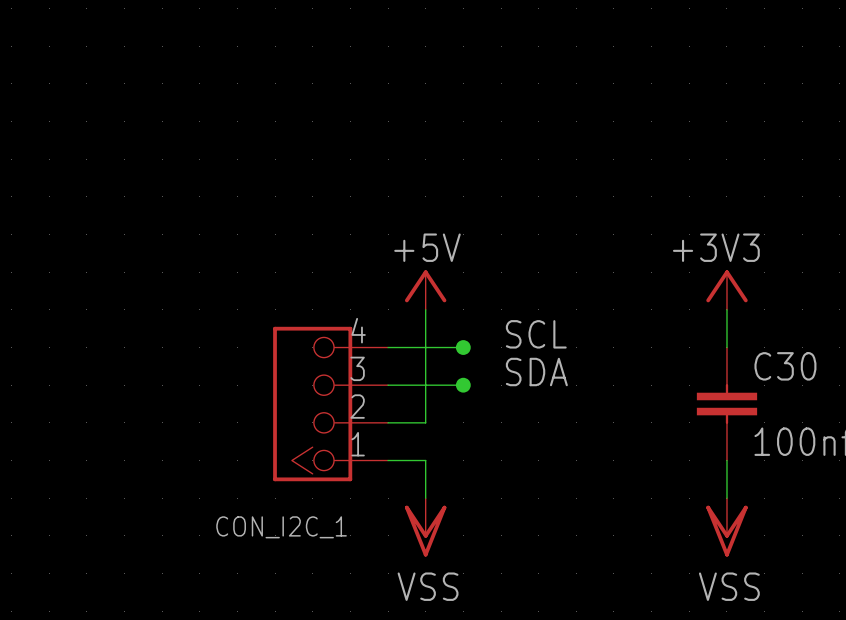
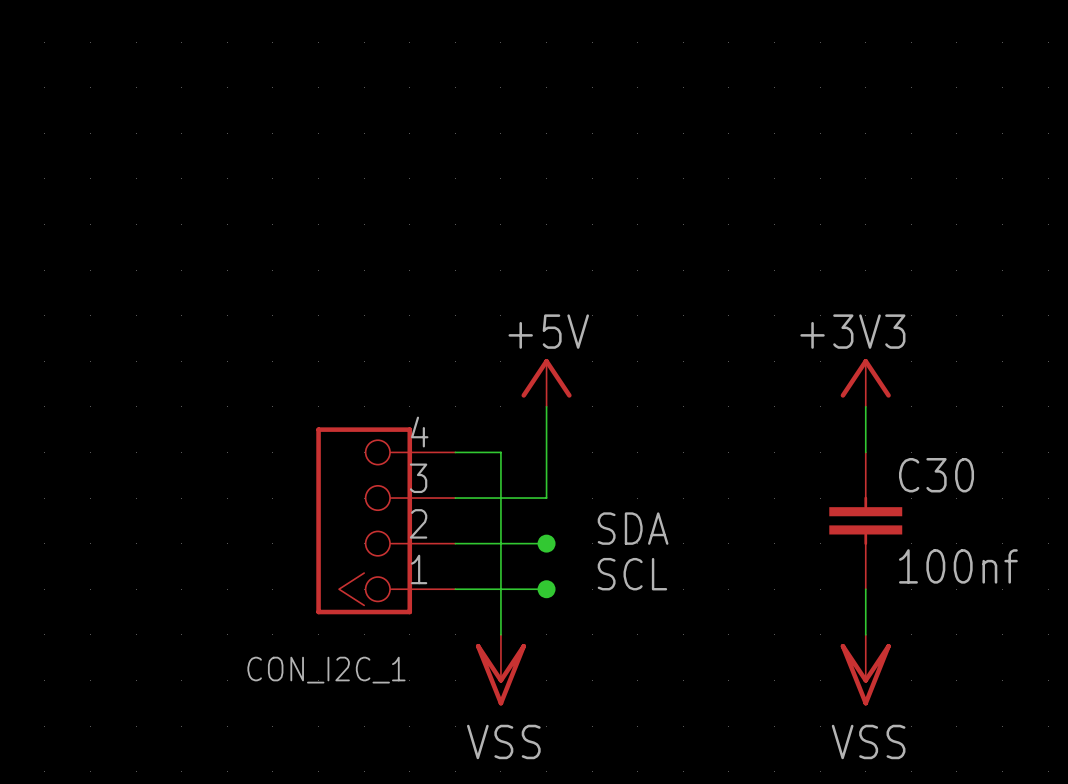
power symbol position: +5V (425, 290) -> +5V (546, 382)
wire: (425, 309) (425, 347) (463, 347) -> none
wire: none -> (546, 406) (546, 498)
label position: SCL (536, 334) -> SCL (632, 574)
junction: (463, 347) -> none
label position: SDA (536, 372) -> SDA (633, 528)
junction: (463, 385) -> none
wire: none -> (546, 543) (500, 543) (500, 589) (546, 589)
junction: none -> (546, 543)
junction: none -> (546, 589)

